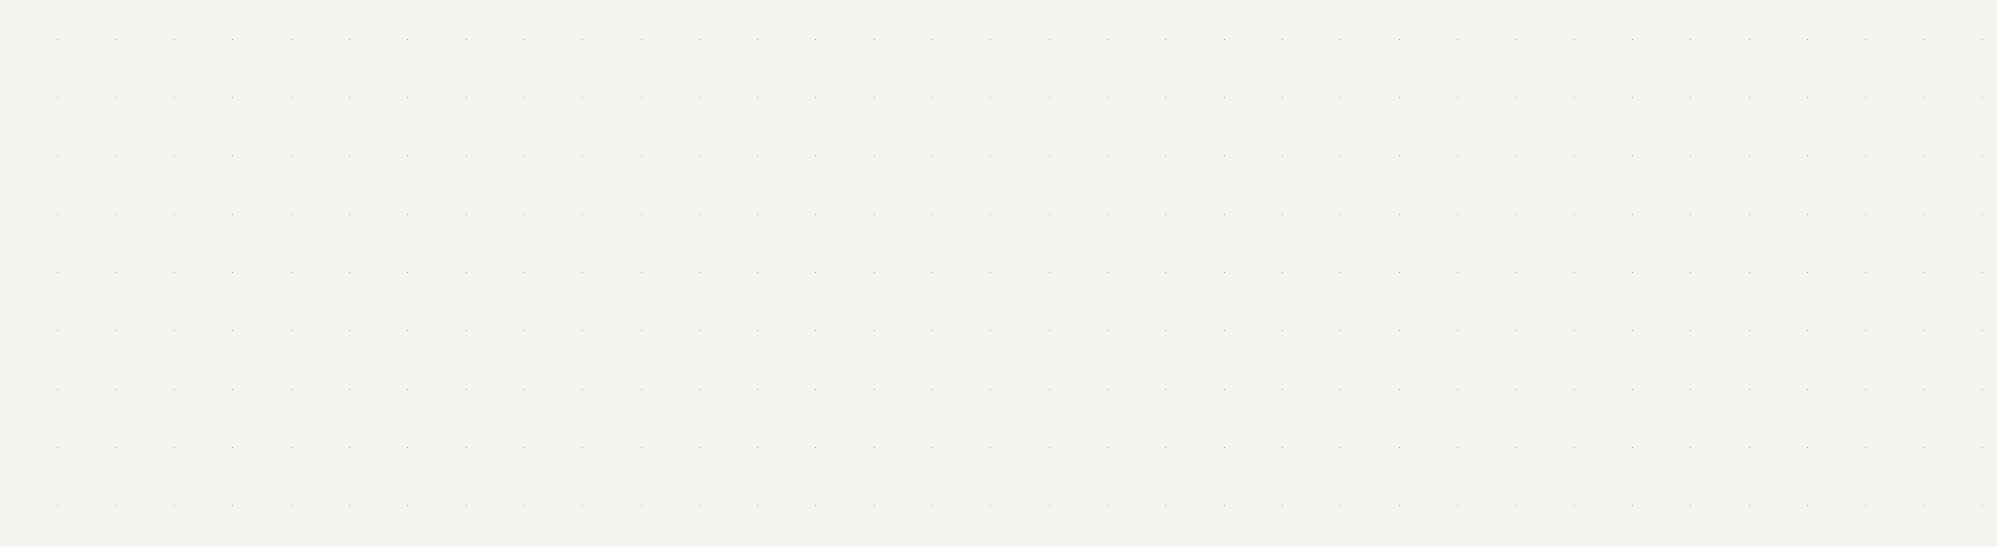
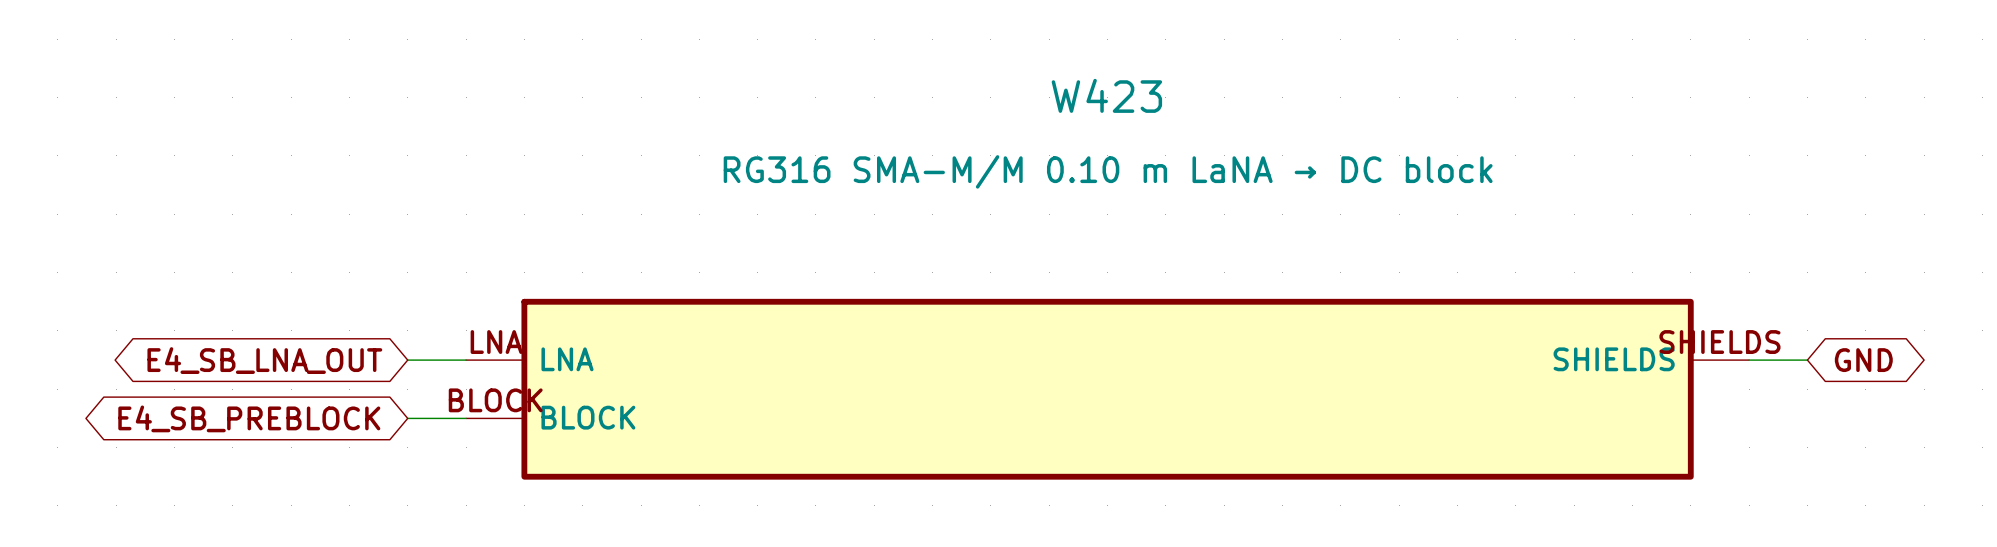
wire: none -> (407, 360) (466, 360)
wire: none -> (1749, 360) (1807, 360)
global label: none -> GND (1863, 360)
global label: none -> E4_SB_LNA_OUT (264, 360)
W423: none -> RG316 SMA-M/M 0.10 m LaNA → DC block (1107, 389)
wire: none -> (407, 418) (466, 418)
global label: none -> E4_SB_PREBLOCK (249, 418)

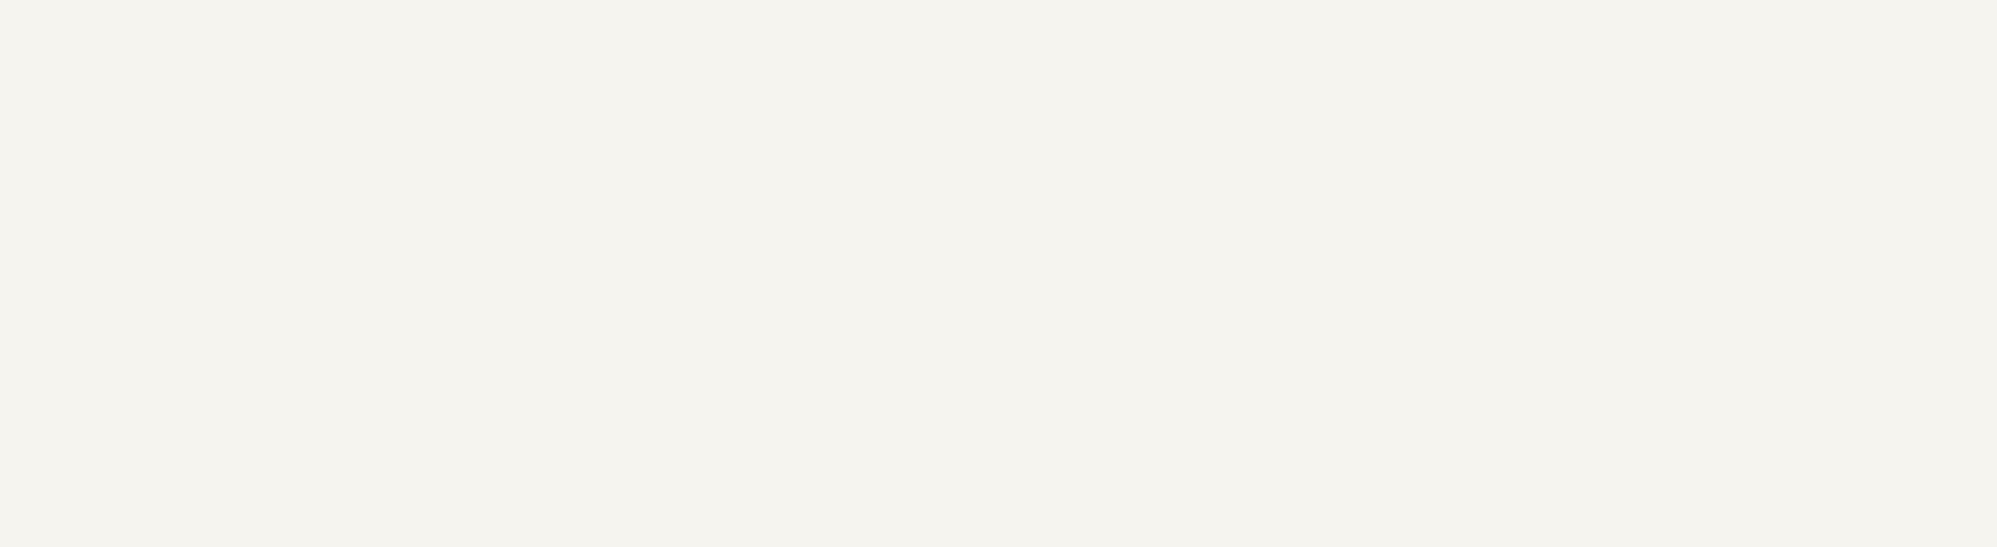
global label: E4_SB_LNA_OUT (264, 360) -> none
wire: (407, 360) (466, 360) -> none
wire: (1749, 360) (1807, 360) -> none
global label: GND (1863, 360) -> none
W423: RG316 SMA-M/M 0.10 m LaNA → DC block (1107, 389) -> none
global label: E4_SB_PREBLOCK (249, 418) -> none
wire: (407, 418) (466, 418) -> none

